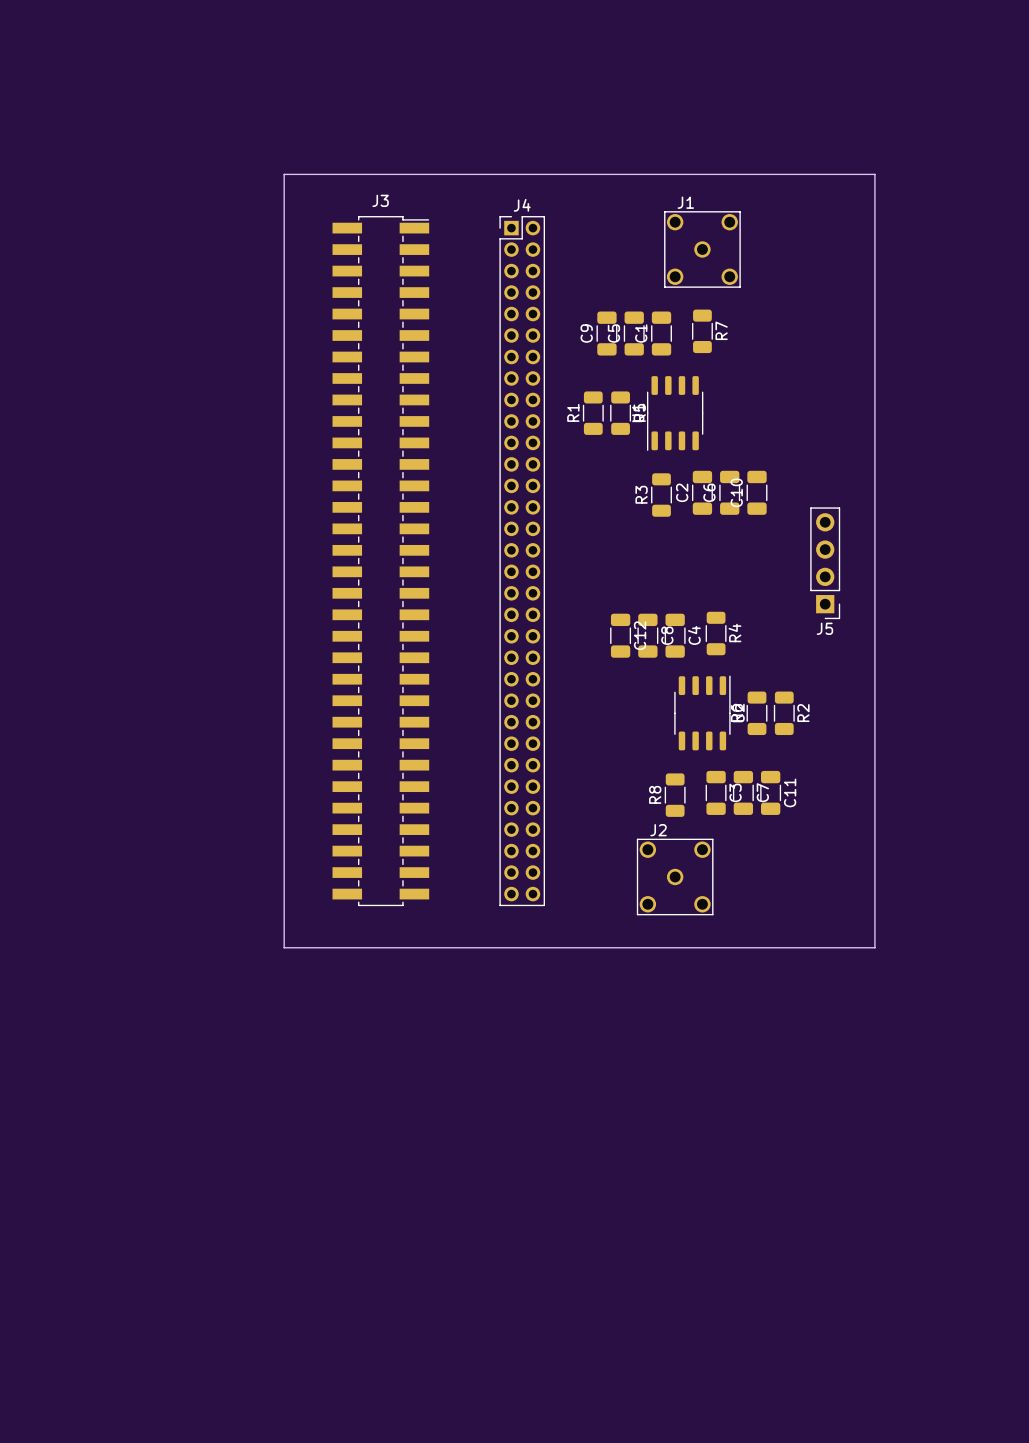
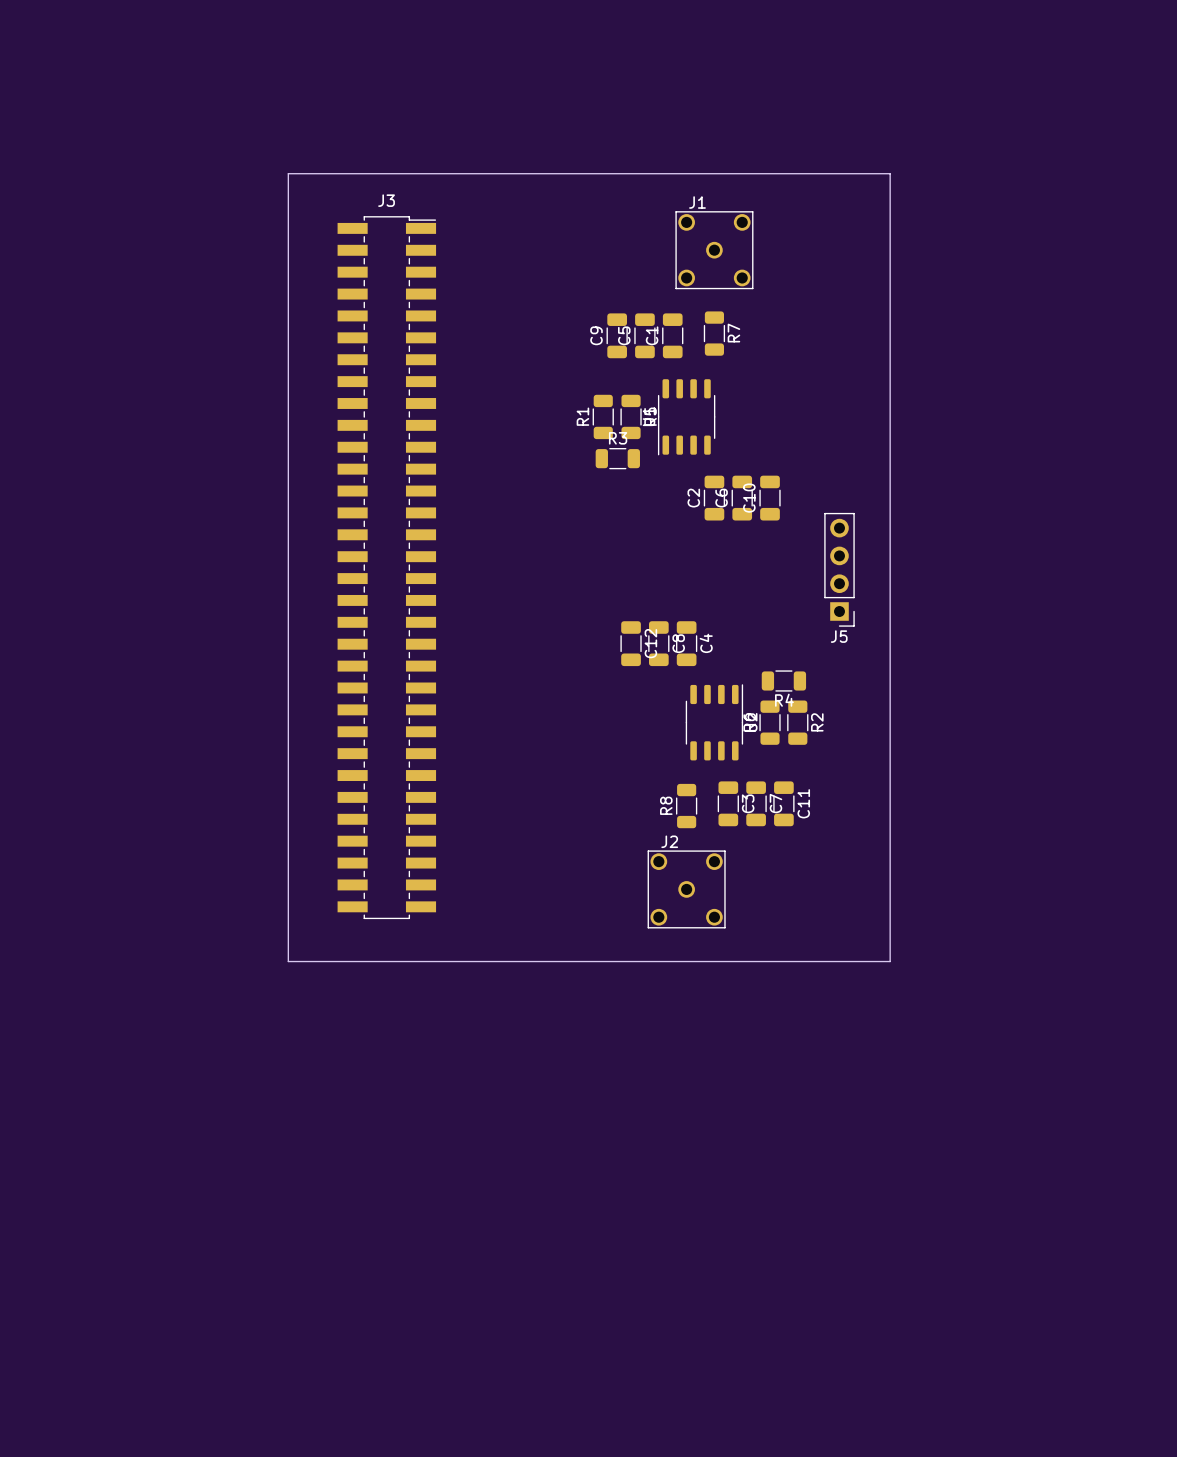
R3 rotation: 0° (661, 495) -> 90° clockwise (617, 458)
R3 position: (661, 495) -> (617, 458)
J4: (522, 561) -> none
R4 rotation: 0° (716, 633) -> 90° clockwise (783, 680)
R4 position: (716, 633) -> (783, 680)

